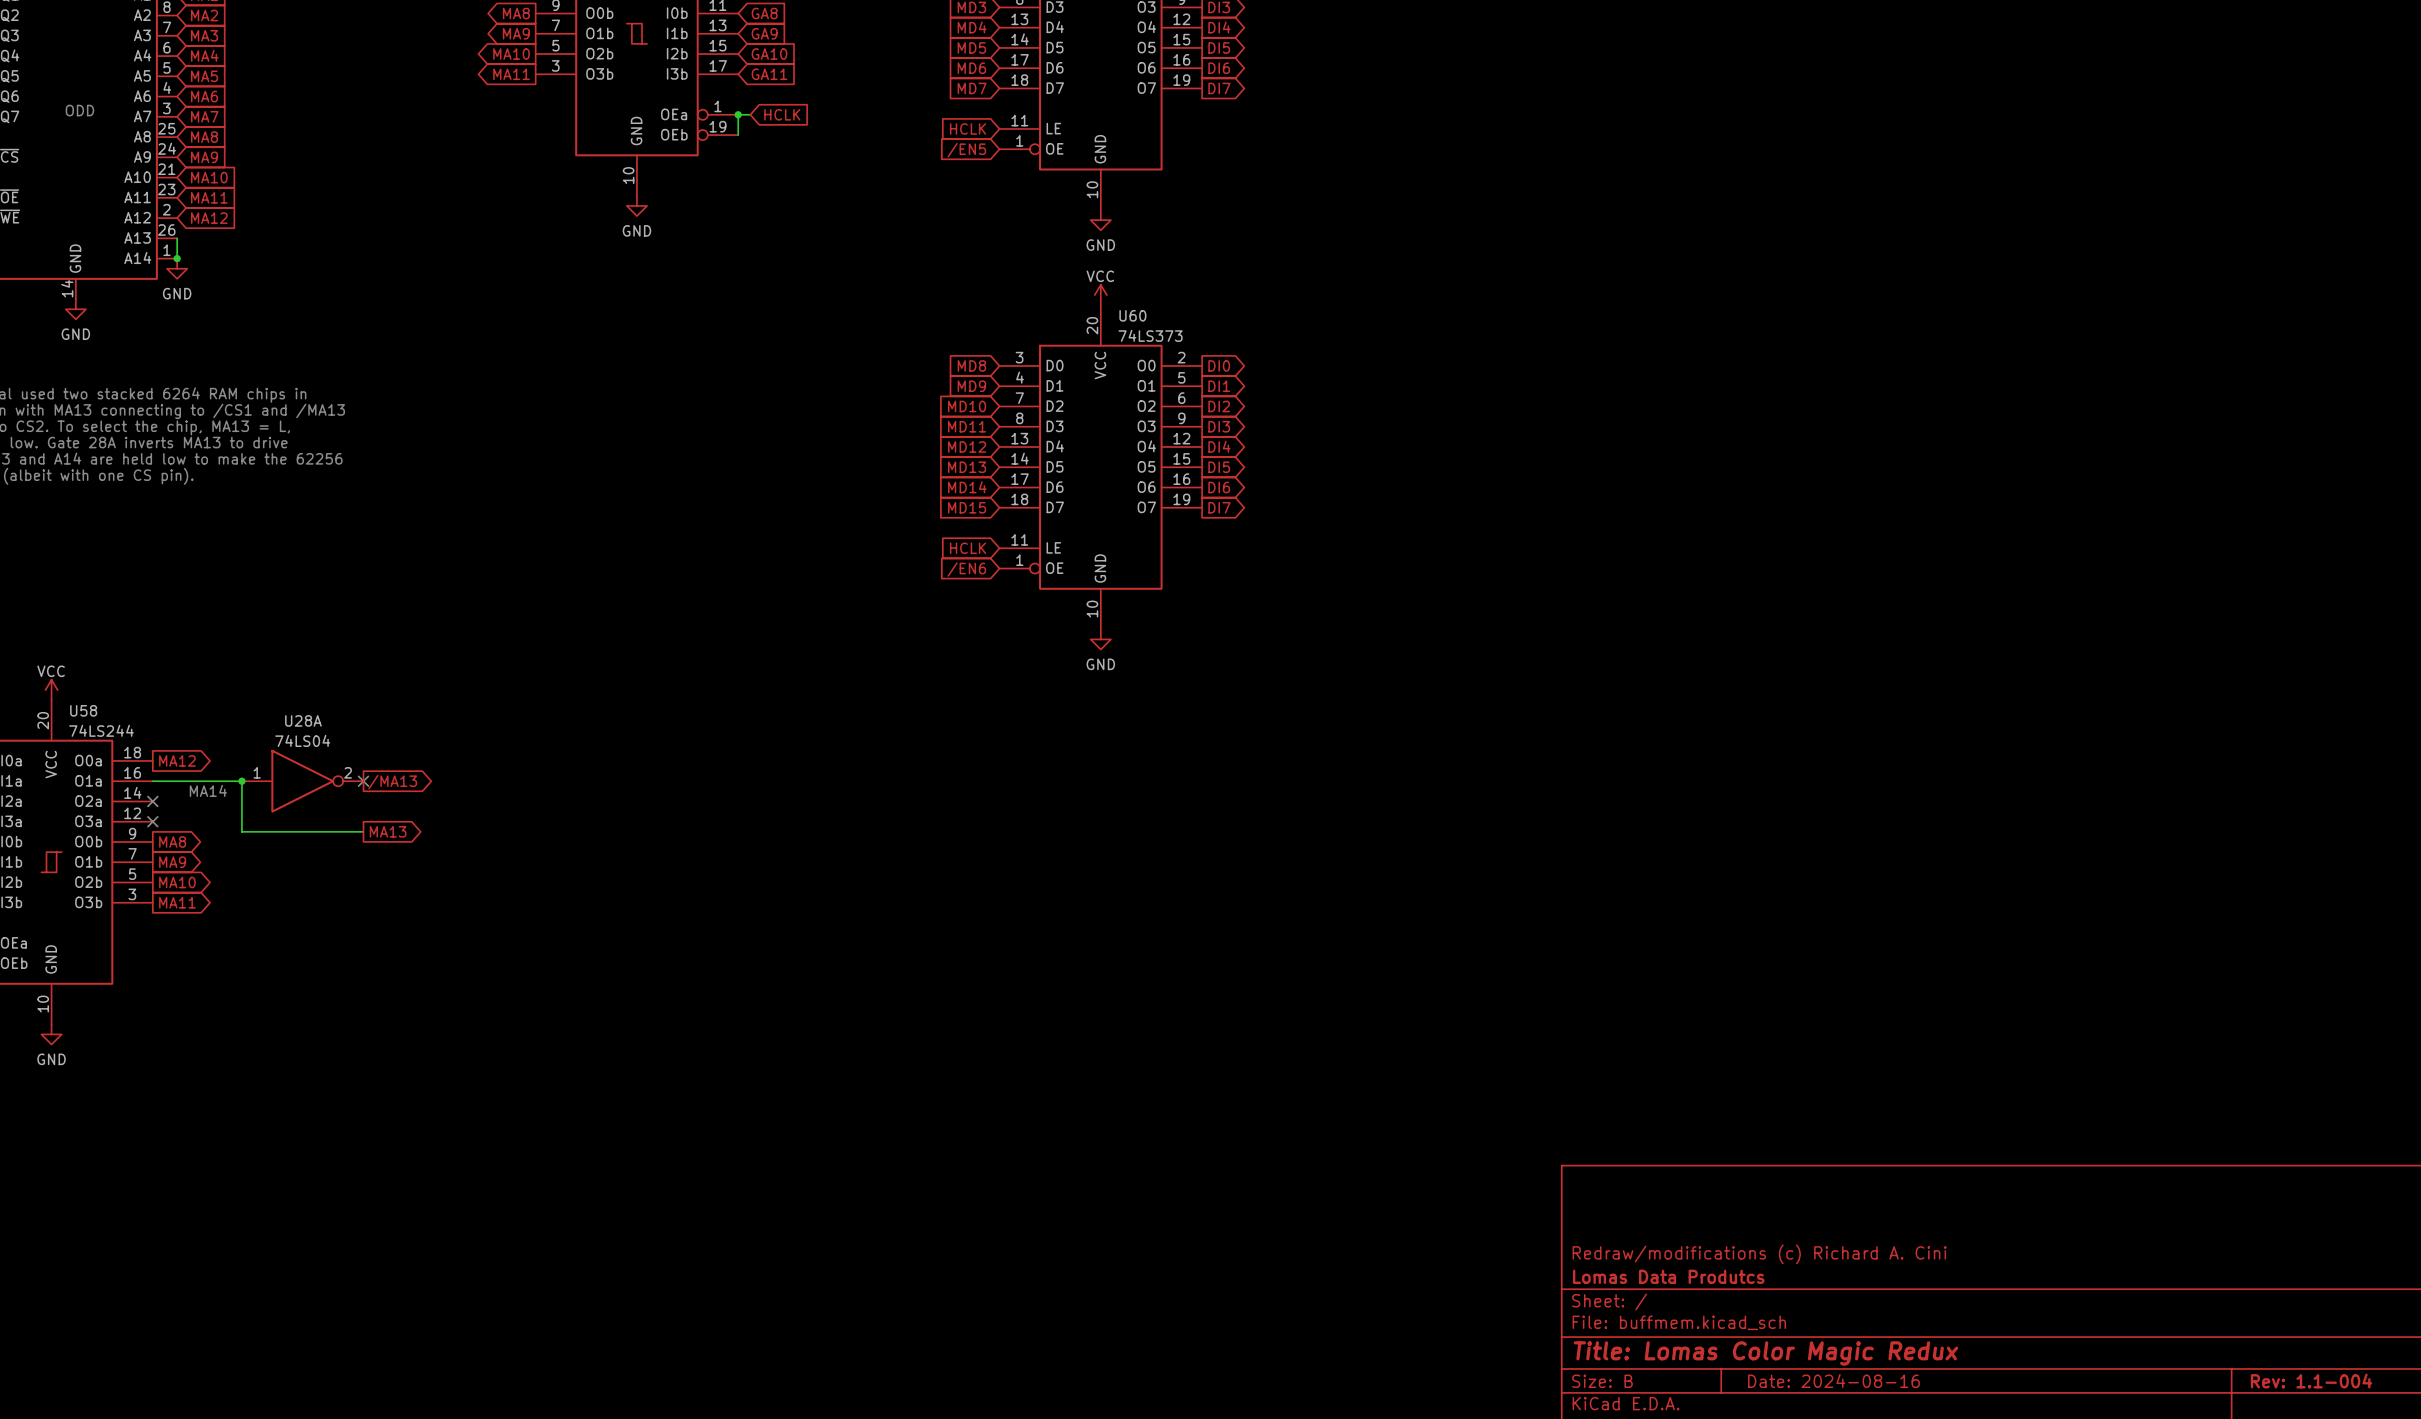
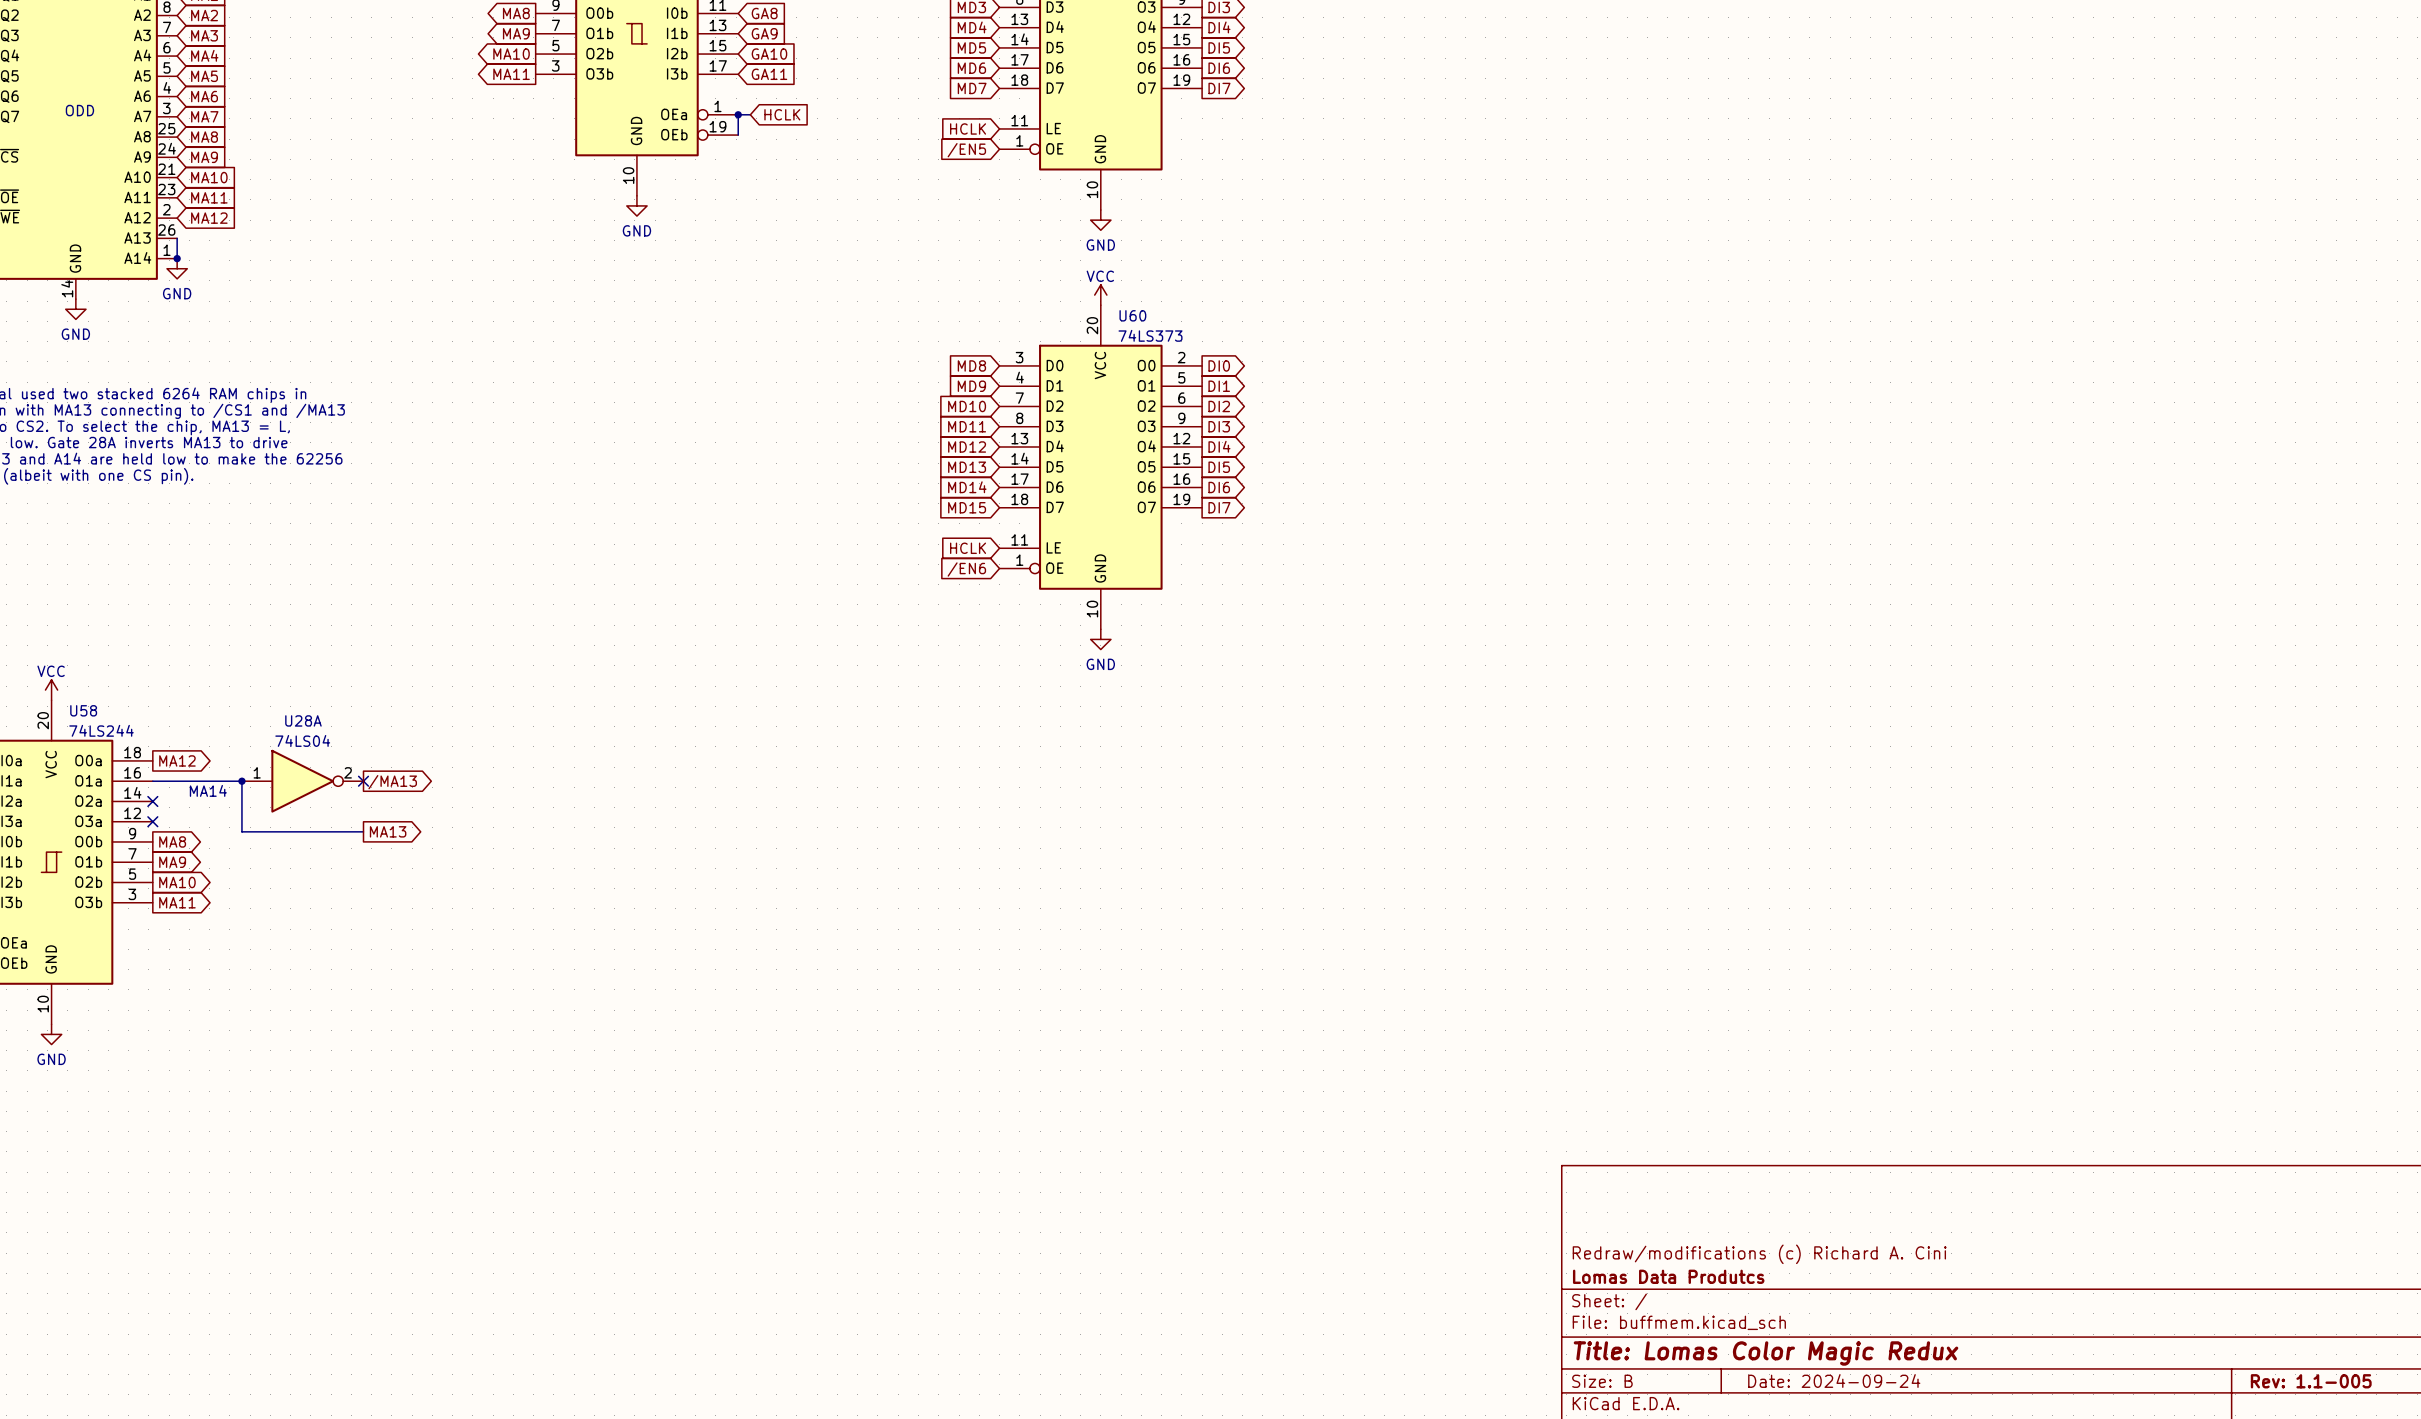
title block: Date: 2024-08-16 (1833, 1380) -> Date: 2024-09-24 (1834, 1380)
title block: Rev: 1.1-004 (2311, 1380) -> Rev: 1.1-005 (2311, 1381)

